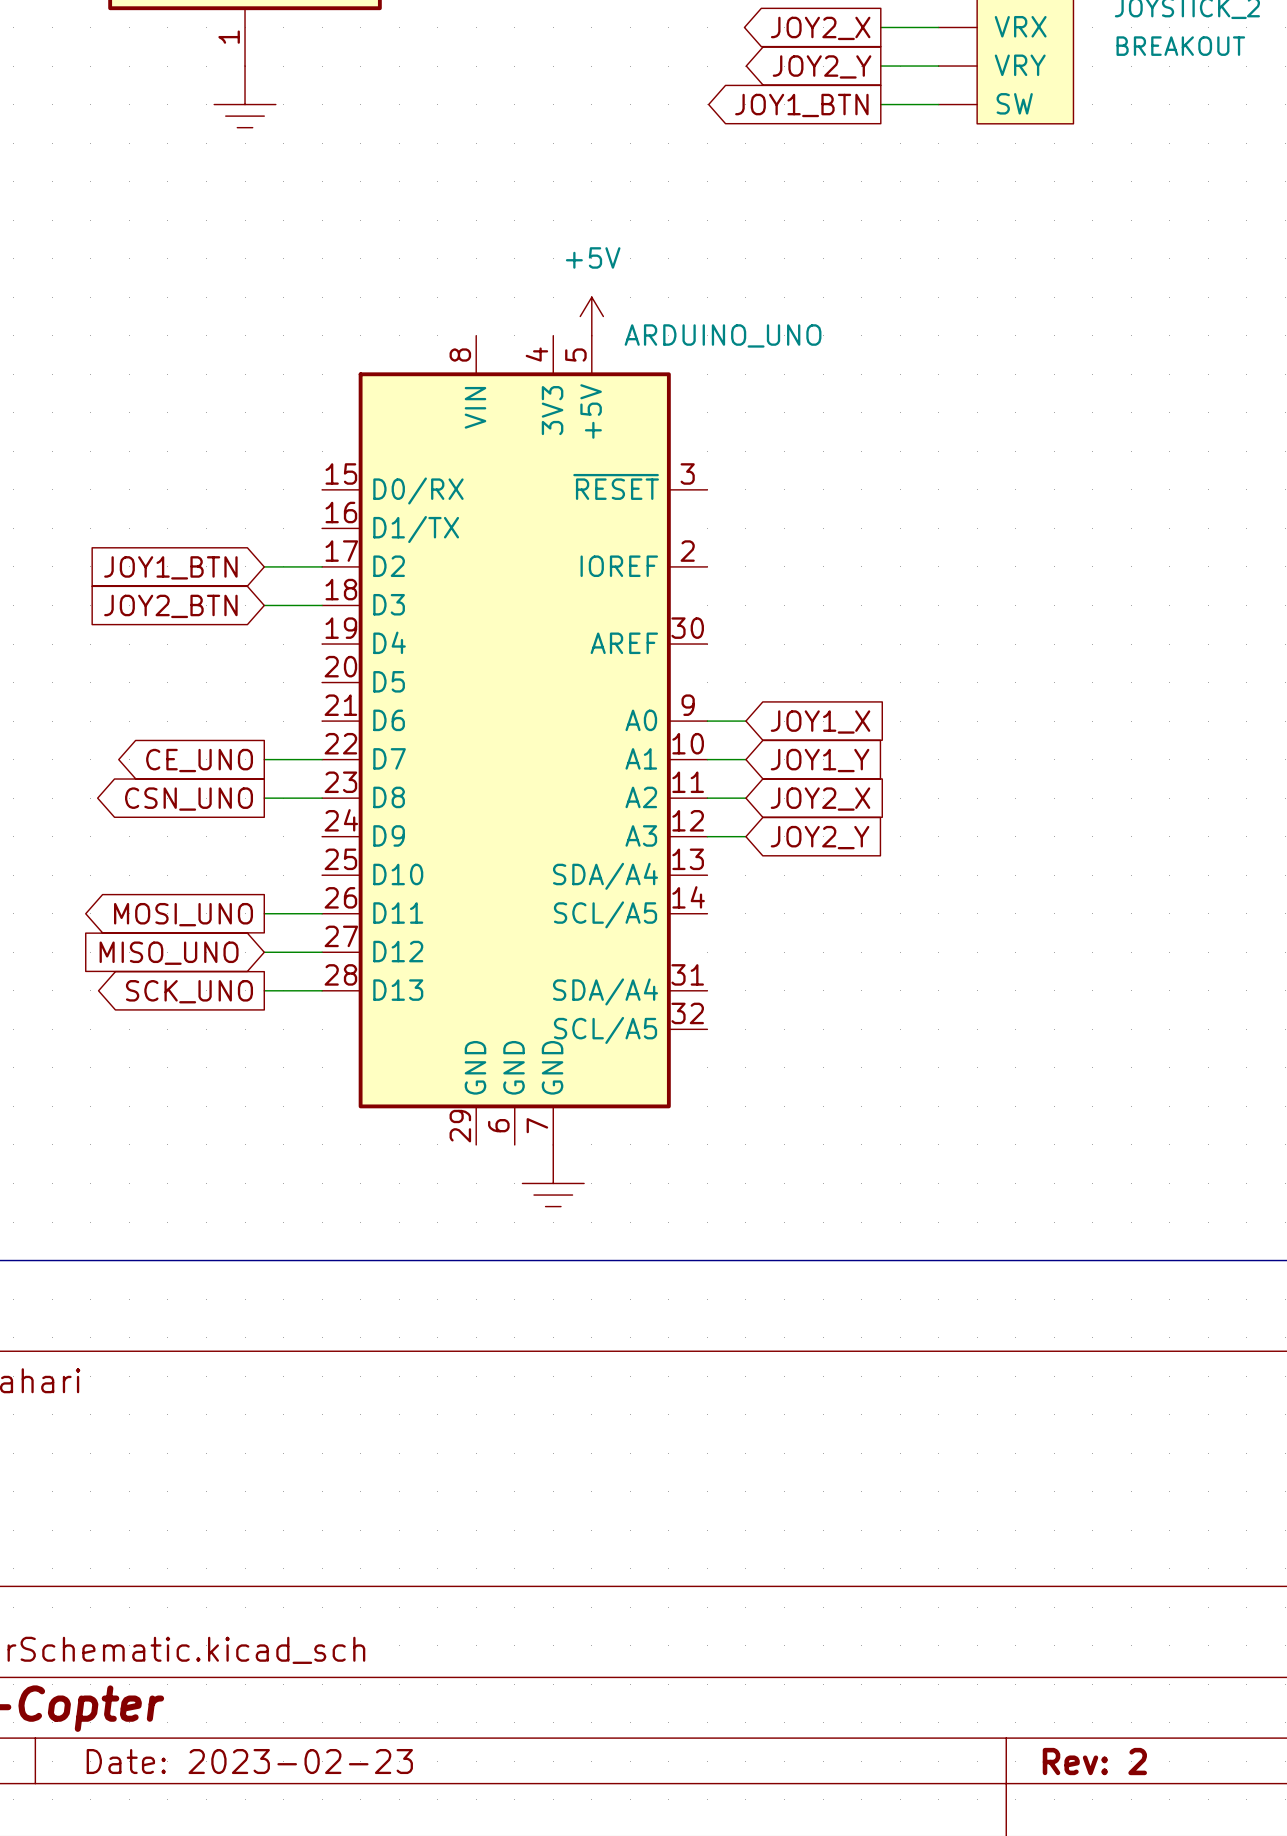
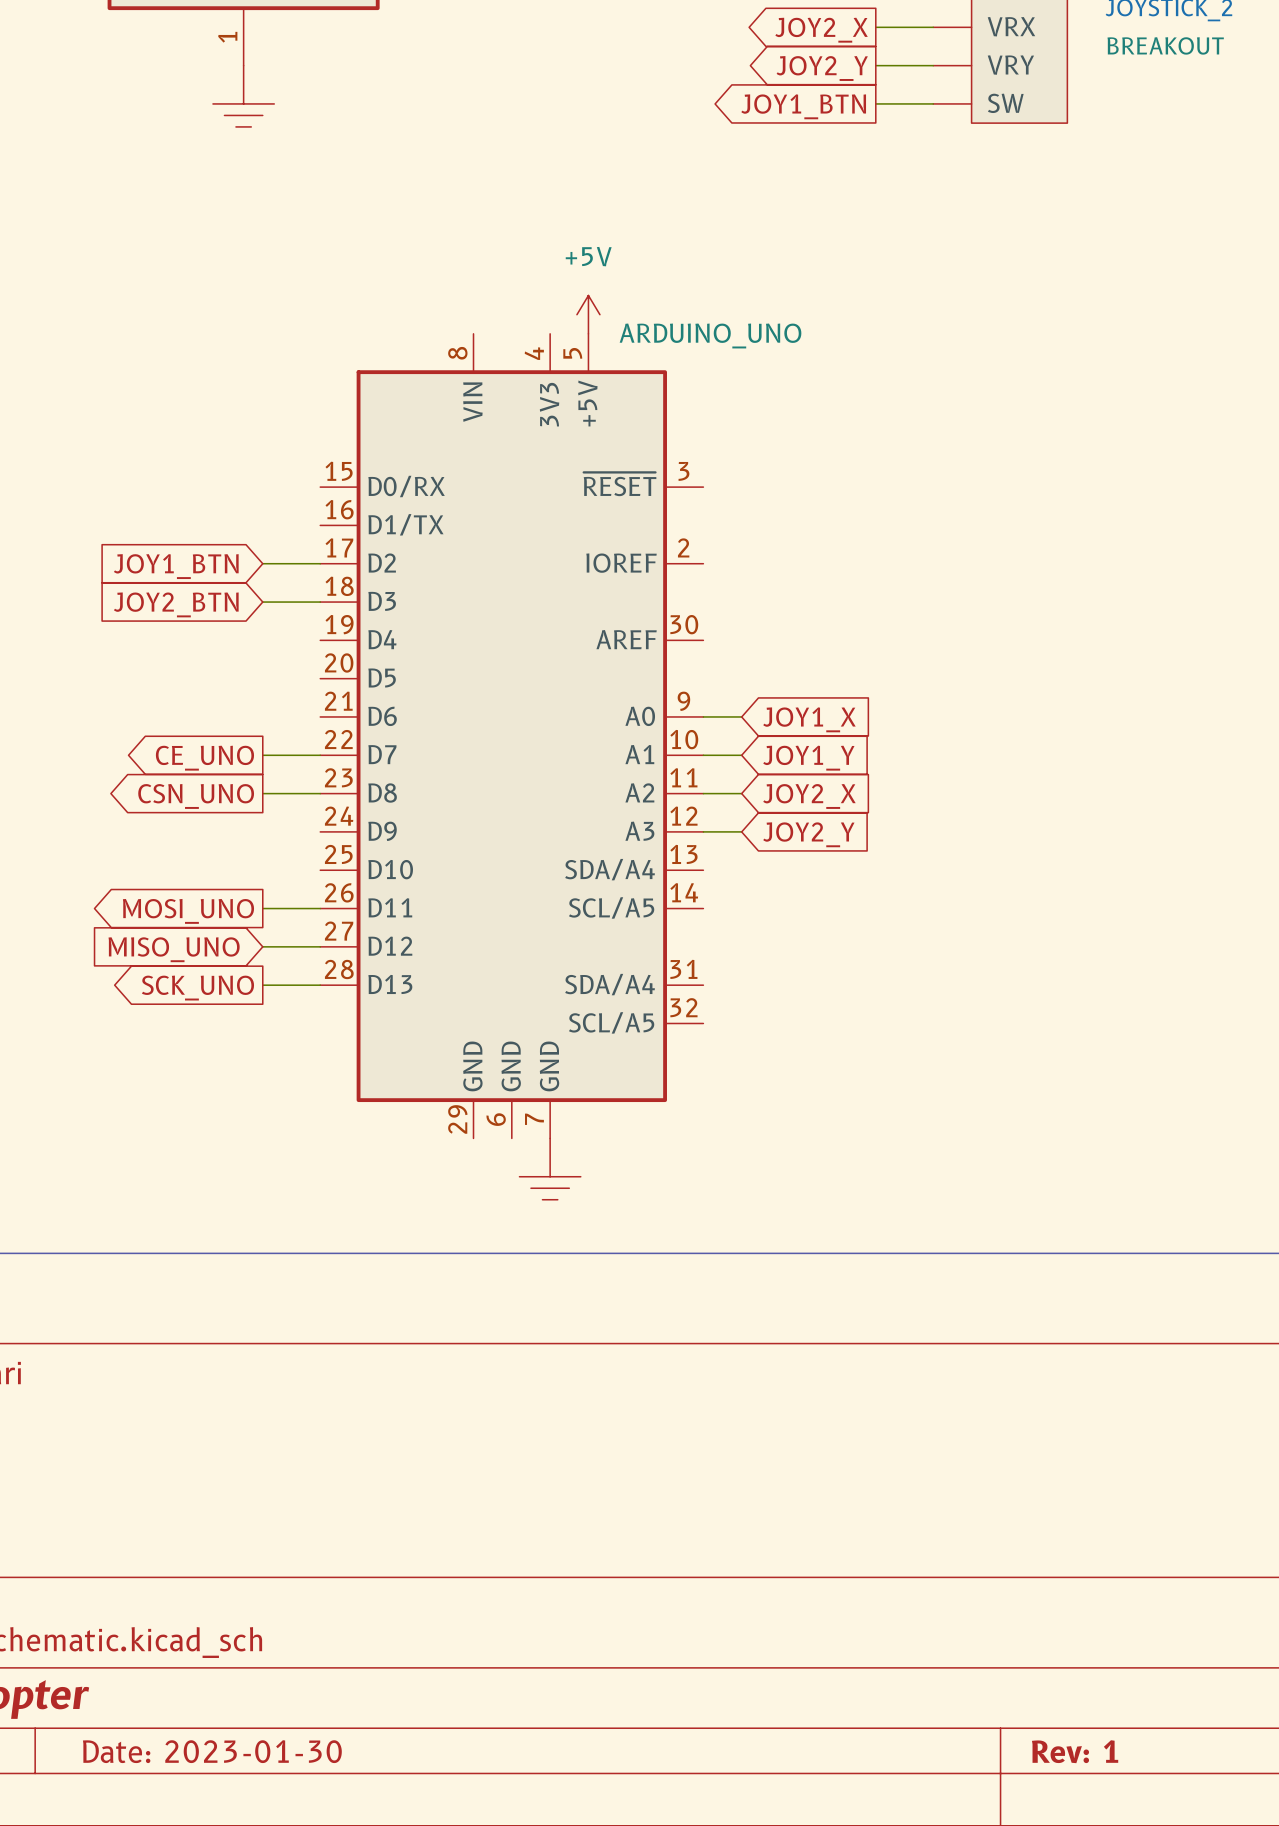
title block: Date: 2023-02-23 (249, 1761) -> Date: 2023-01-30 (212, 1751)
title block: Rev: 2 (1094, 1761) -> Rev: 1 (1075, 1751)

